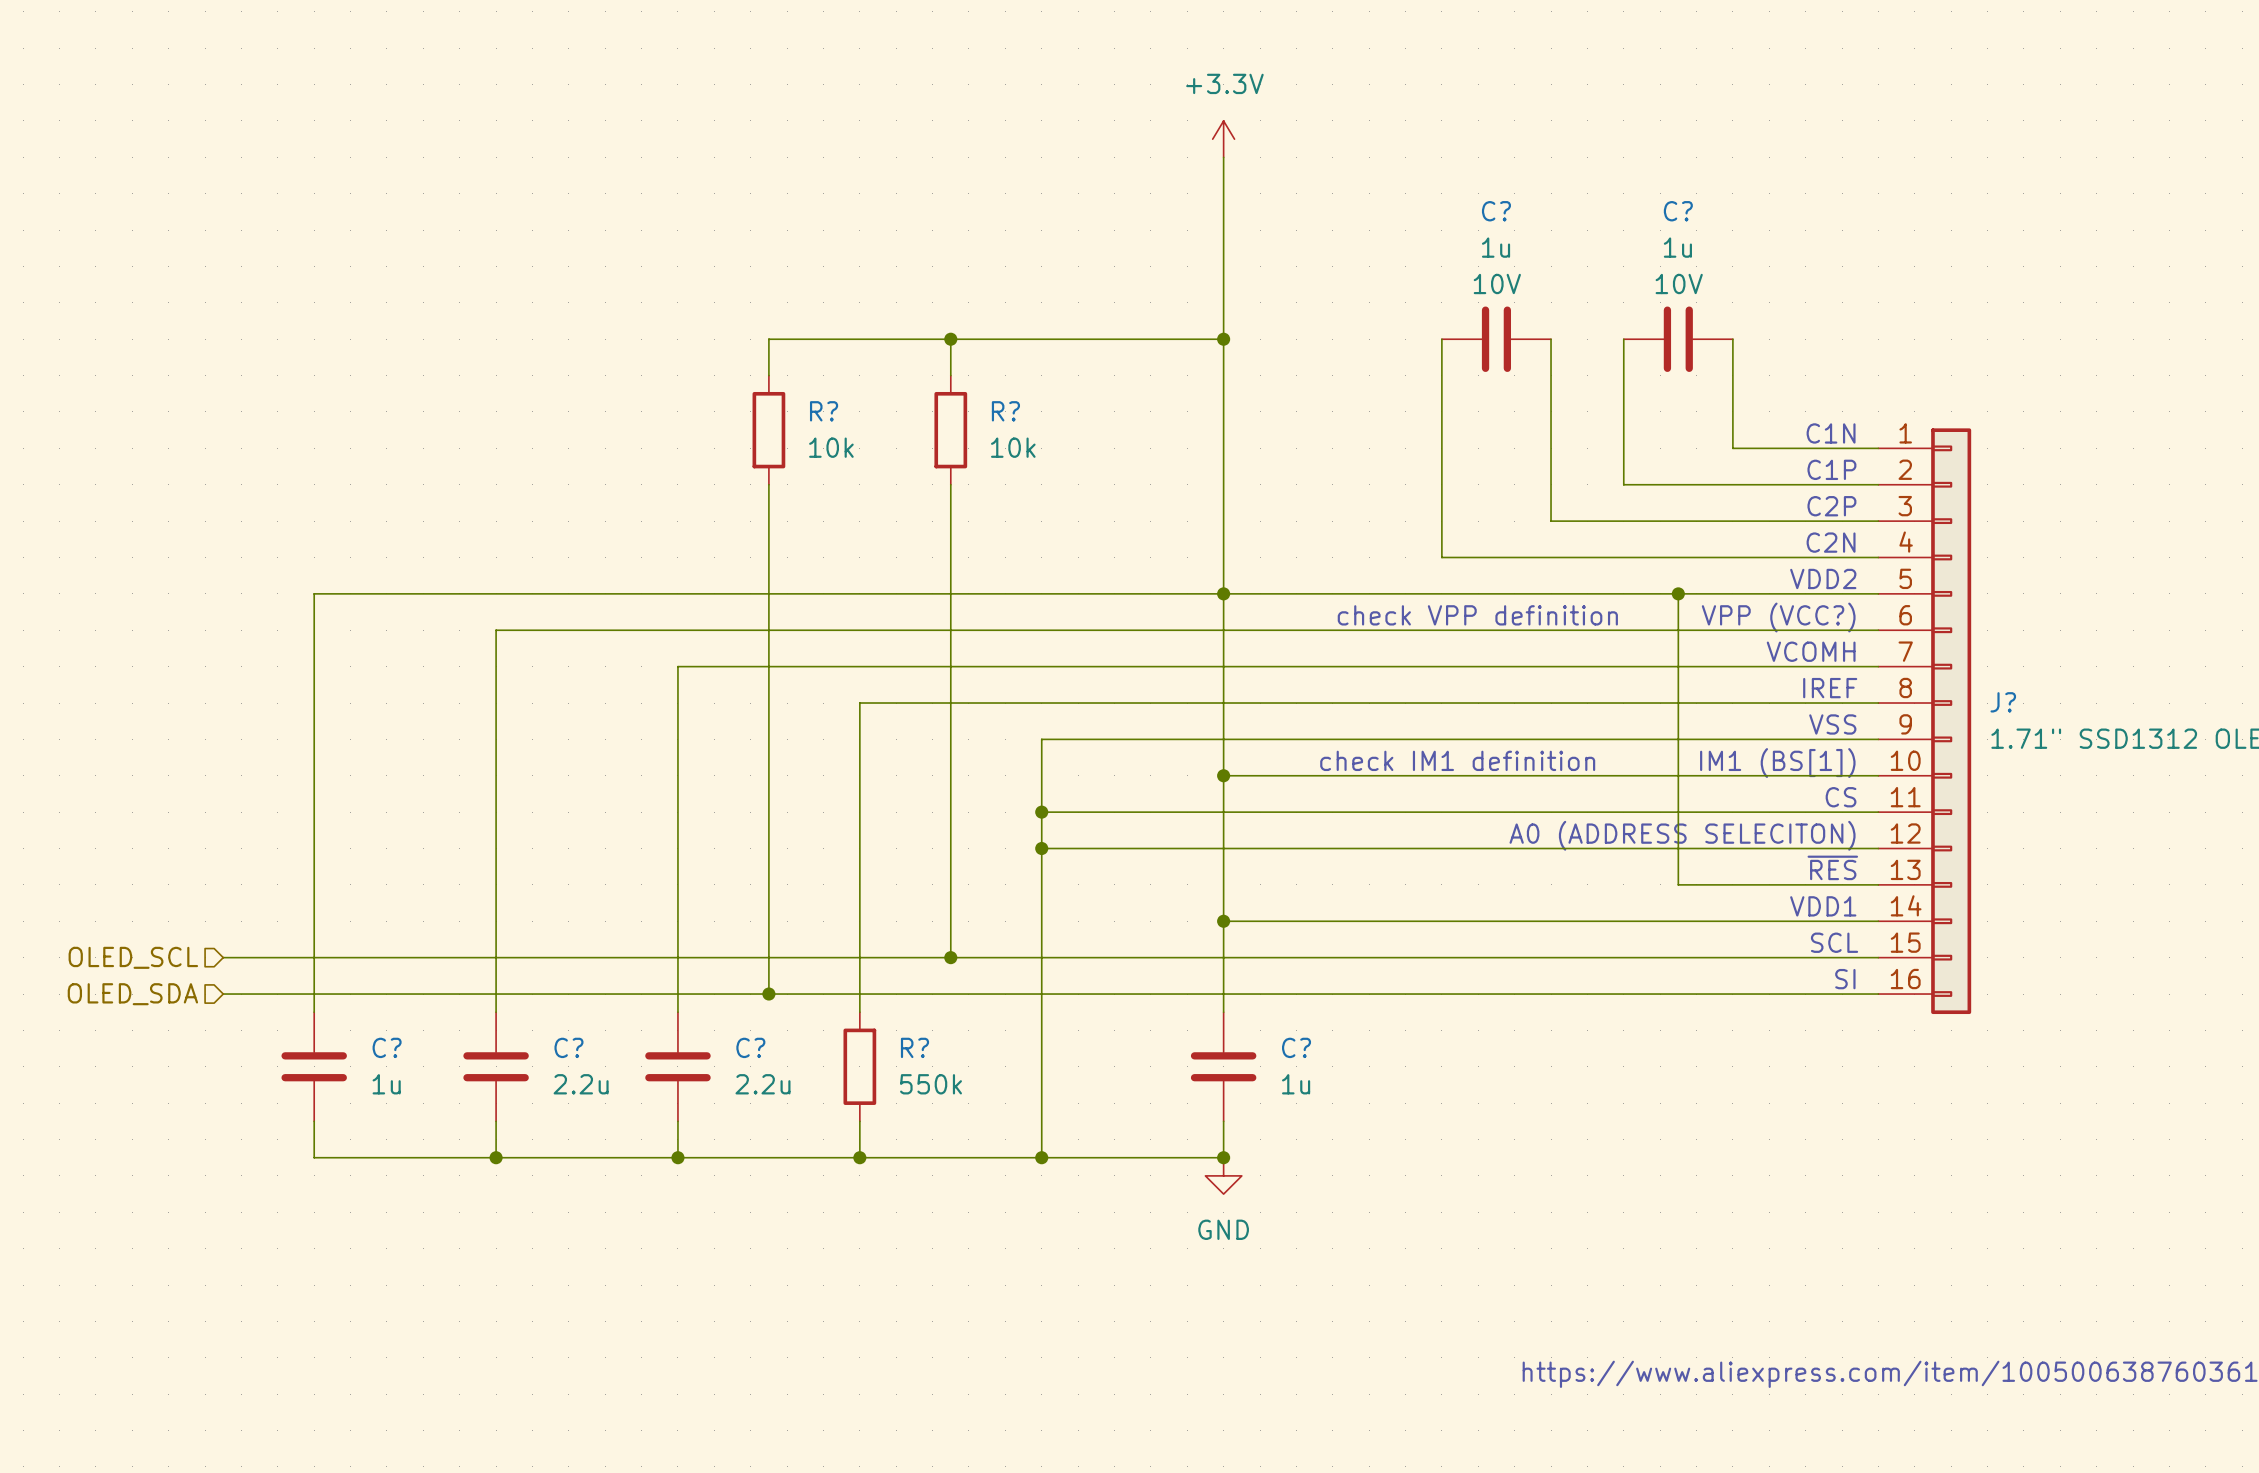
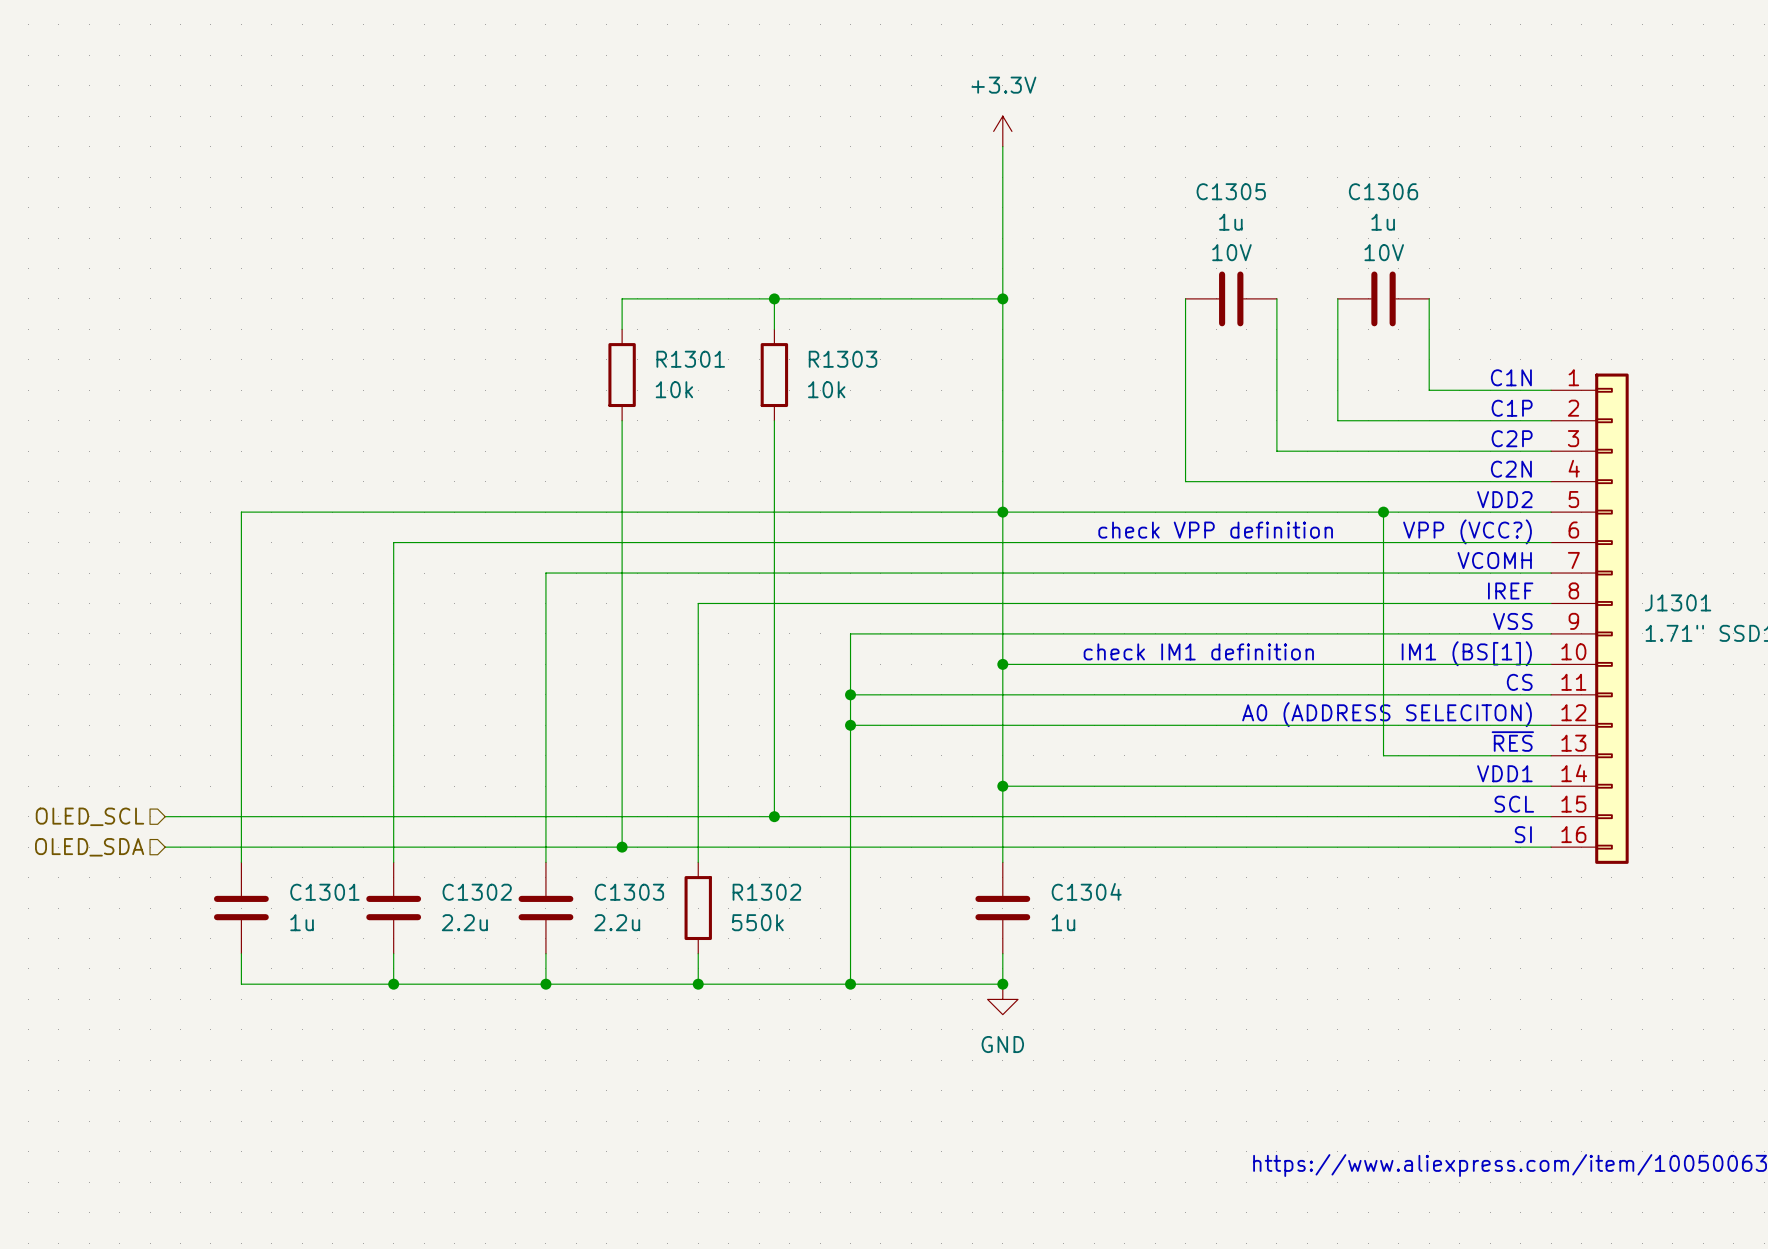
C? name: C? (1496, 211) -> C1305 (1231, 191)
C? name: C? (1678, 211) -> C1306 (1383, 191)
R? name: R? (824, 411) -> R1301 (690, 359)
R? name: R? (1005, 411) -> R1303 (843, 359)
J? name: J? (2003, 702) -> J1301 (1678, 602)
C? name: C? (387, 1047) -> C1301 (324, 892)
C? name: C? (568, 1047) -> C1302 (477, 892)
C? name: C? (750, 1047) -> C1303 (629, 892)
R? name: R? (914, 1047) -> R1302 (766, 892)
C? name: C? (1296, 1047) -> C1304 (1086, 891)

